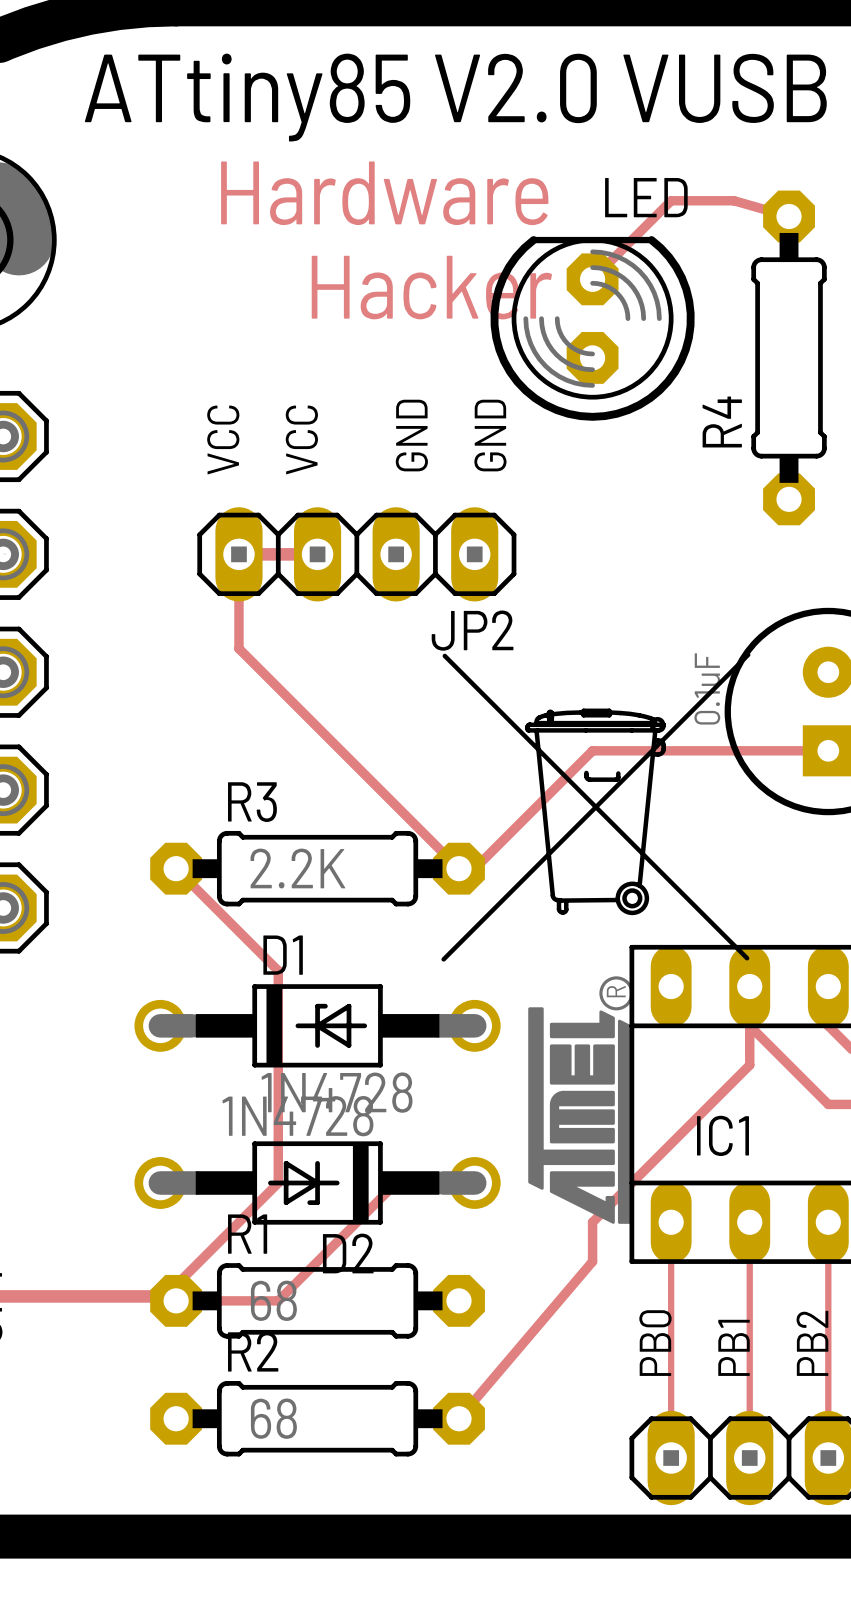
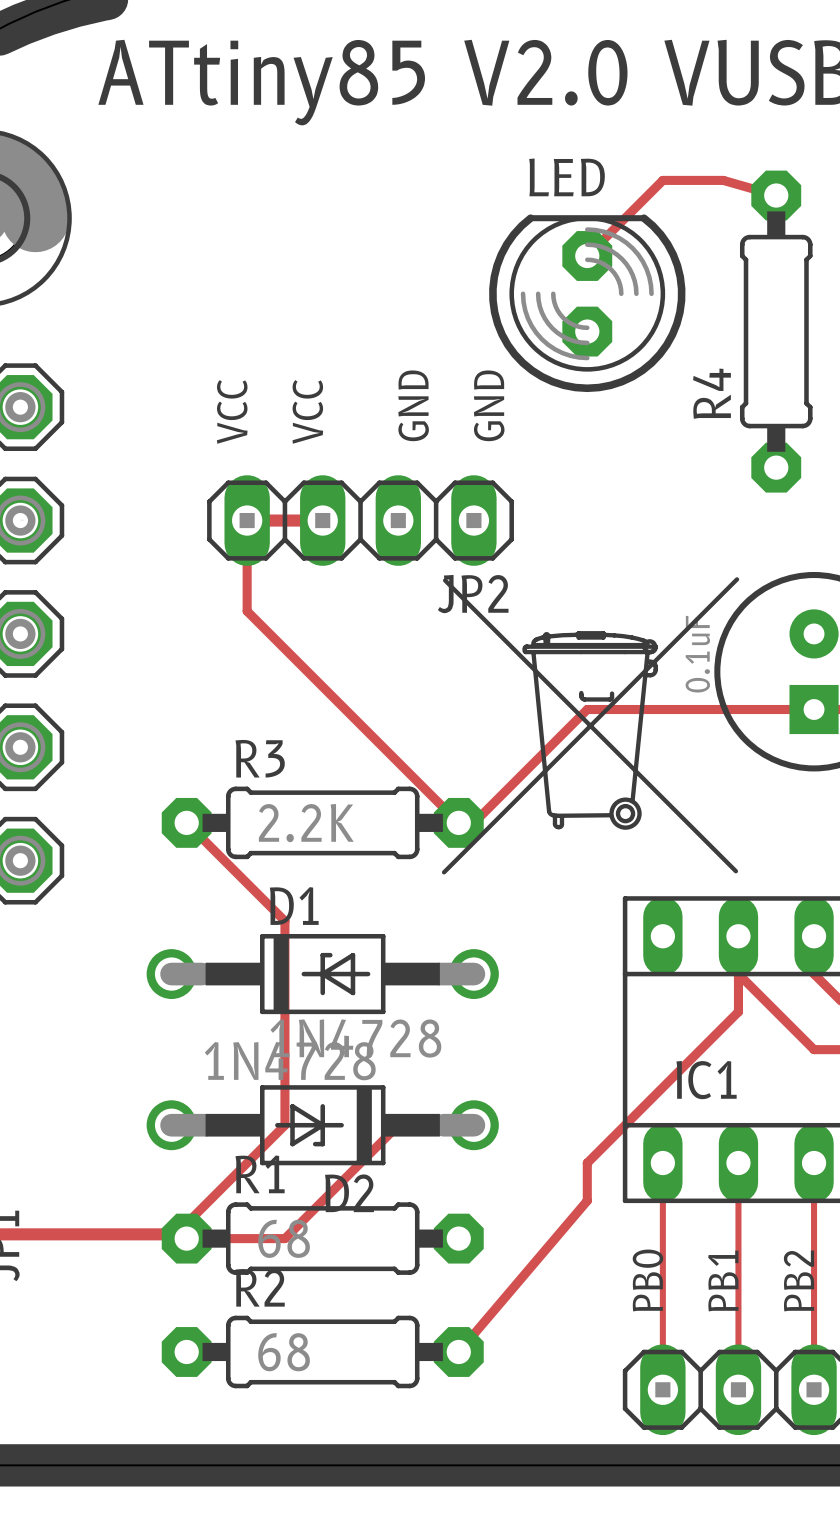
text: Hardware (384, 193) -> none
LED name position: LED (646, 197) -> LED (567, 177)
text: Hacker (431, 287) -> none
drawing position: (595, 807) -> (590, 725)
drawing: [528, 976, 634, 1224] -> none

